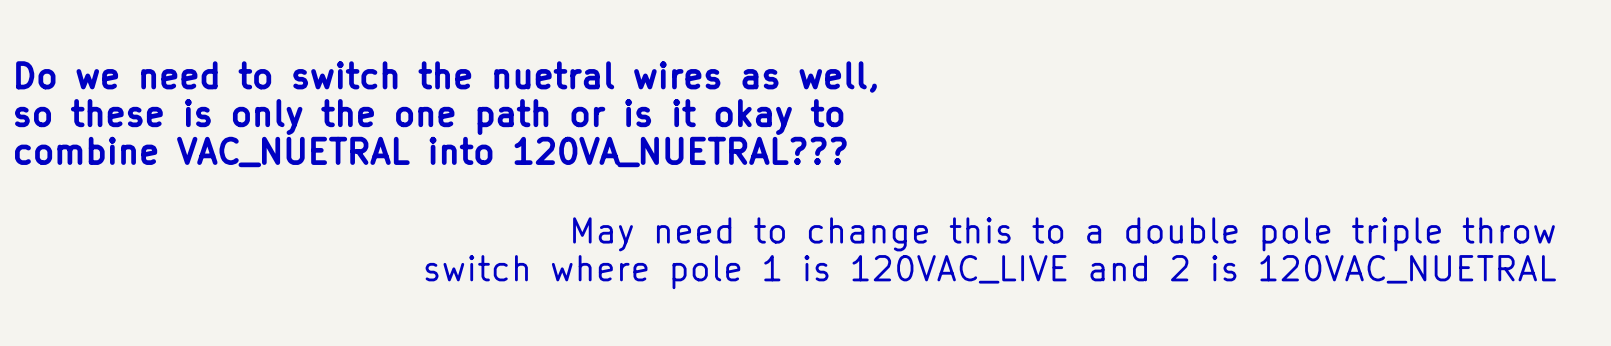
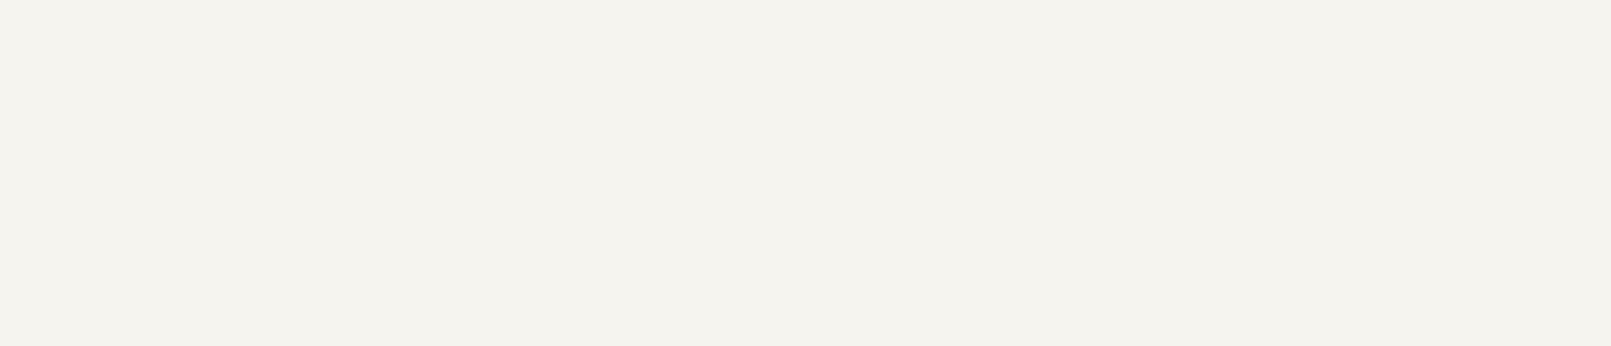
text: Do we need to switch the nuetral wires as well, (446, 76) -> none
text: so these is only the one path or is it okay to (429, 117) -> none
text: combine VAC_NUETRAL into 120VA_NUETRAL??? (430, 151) -> none
text: May need to change this to a double pole triple throw (1063, 234) -> none
text: switch where pole 1 is 120VAC_LIVE and 2 is 120VAC_NUETRAL (990, 272) -> none

